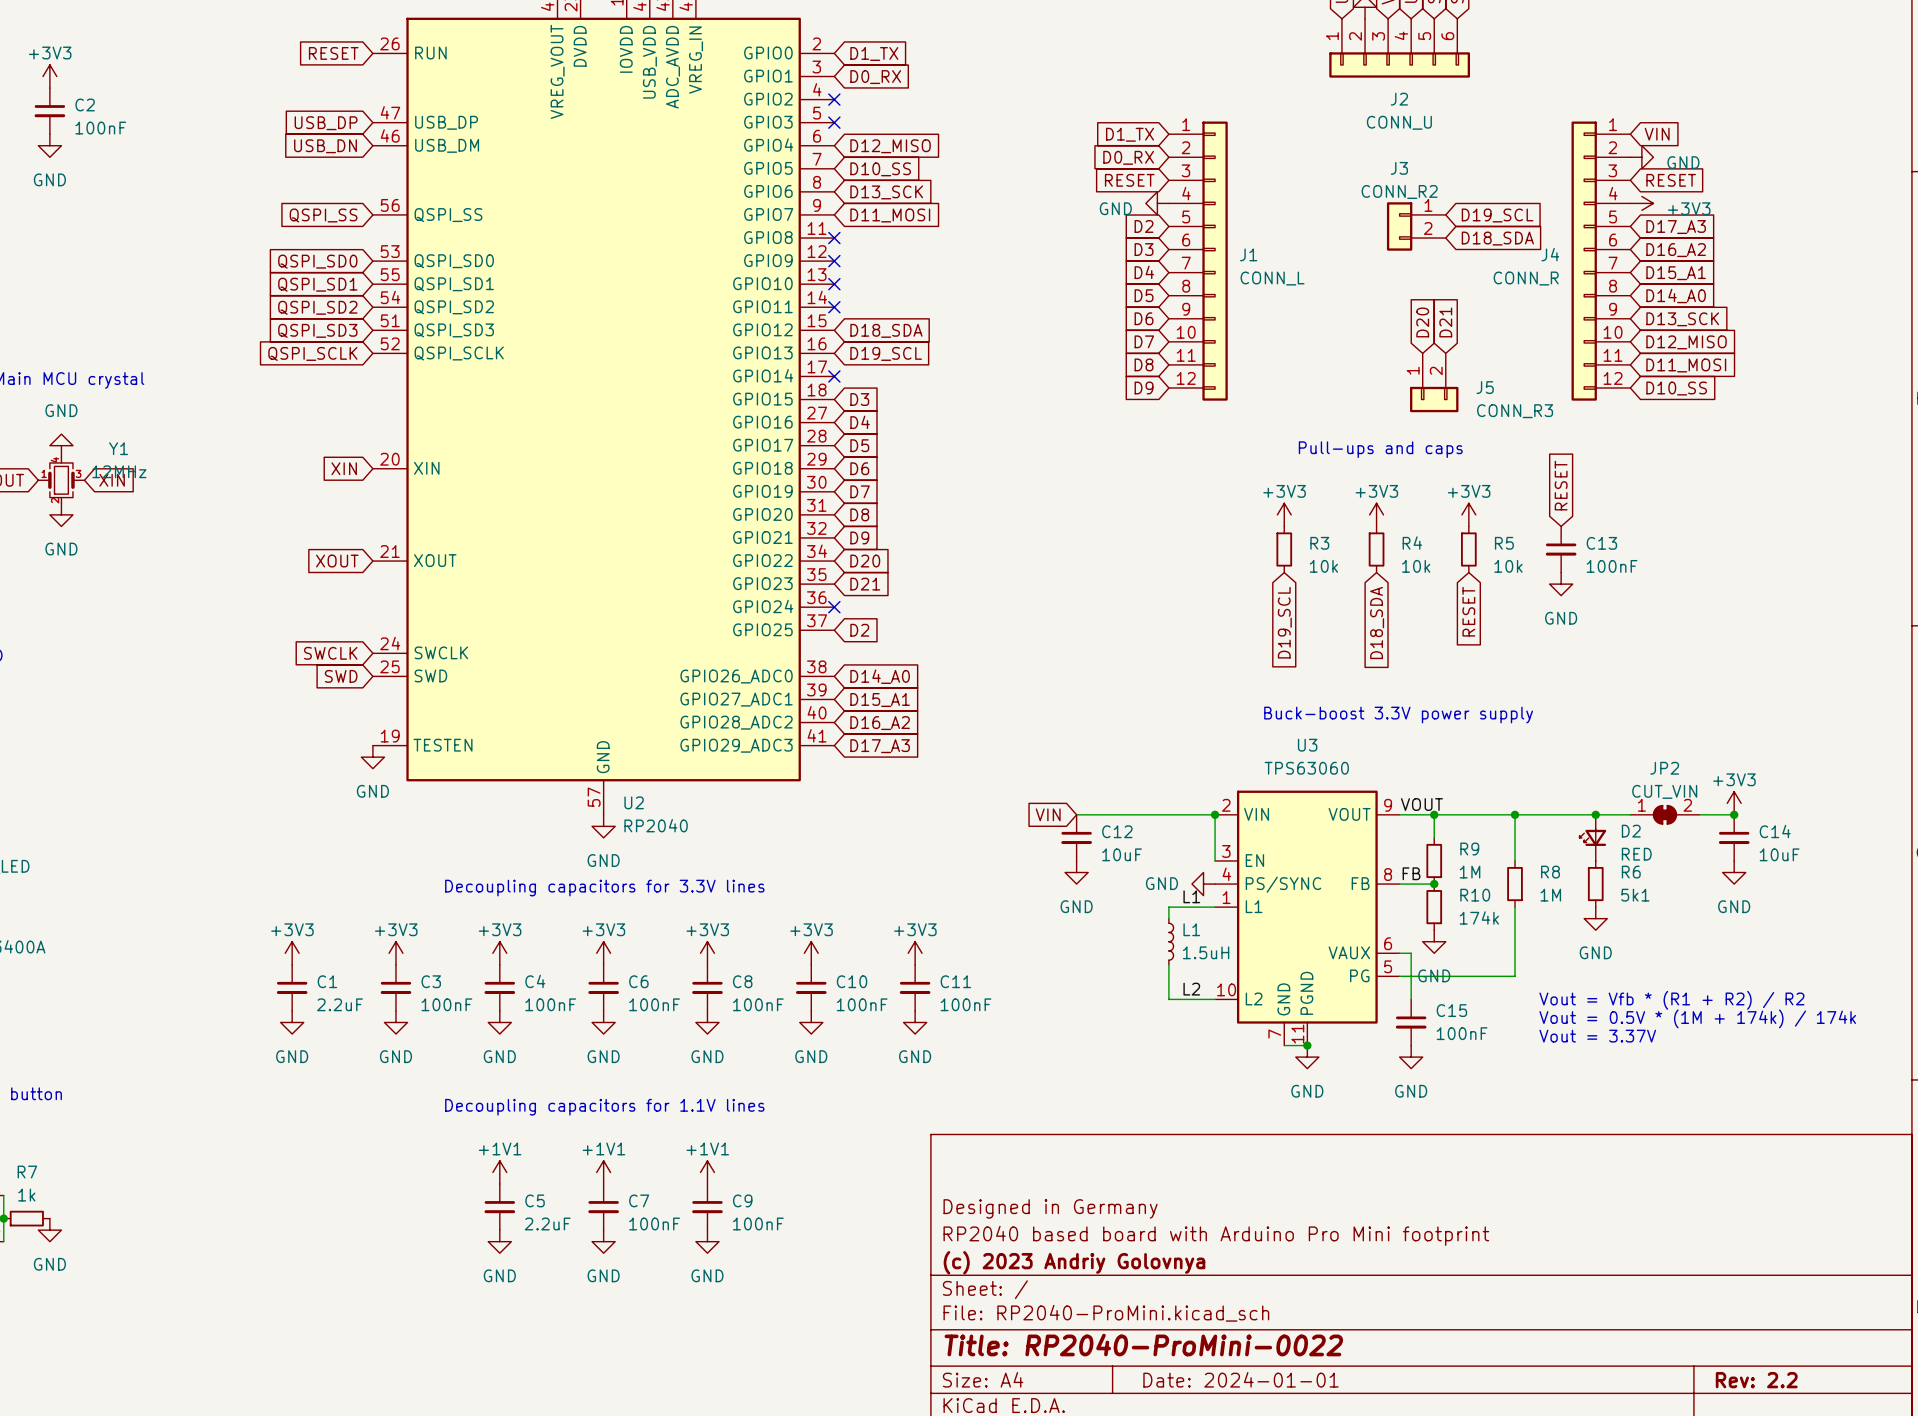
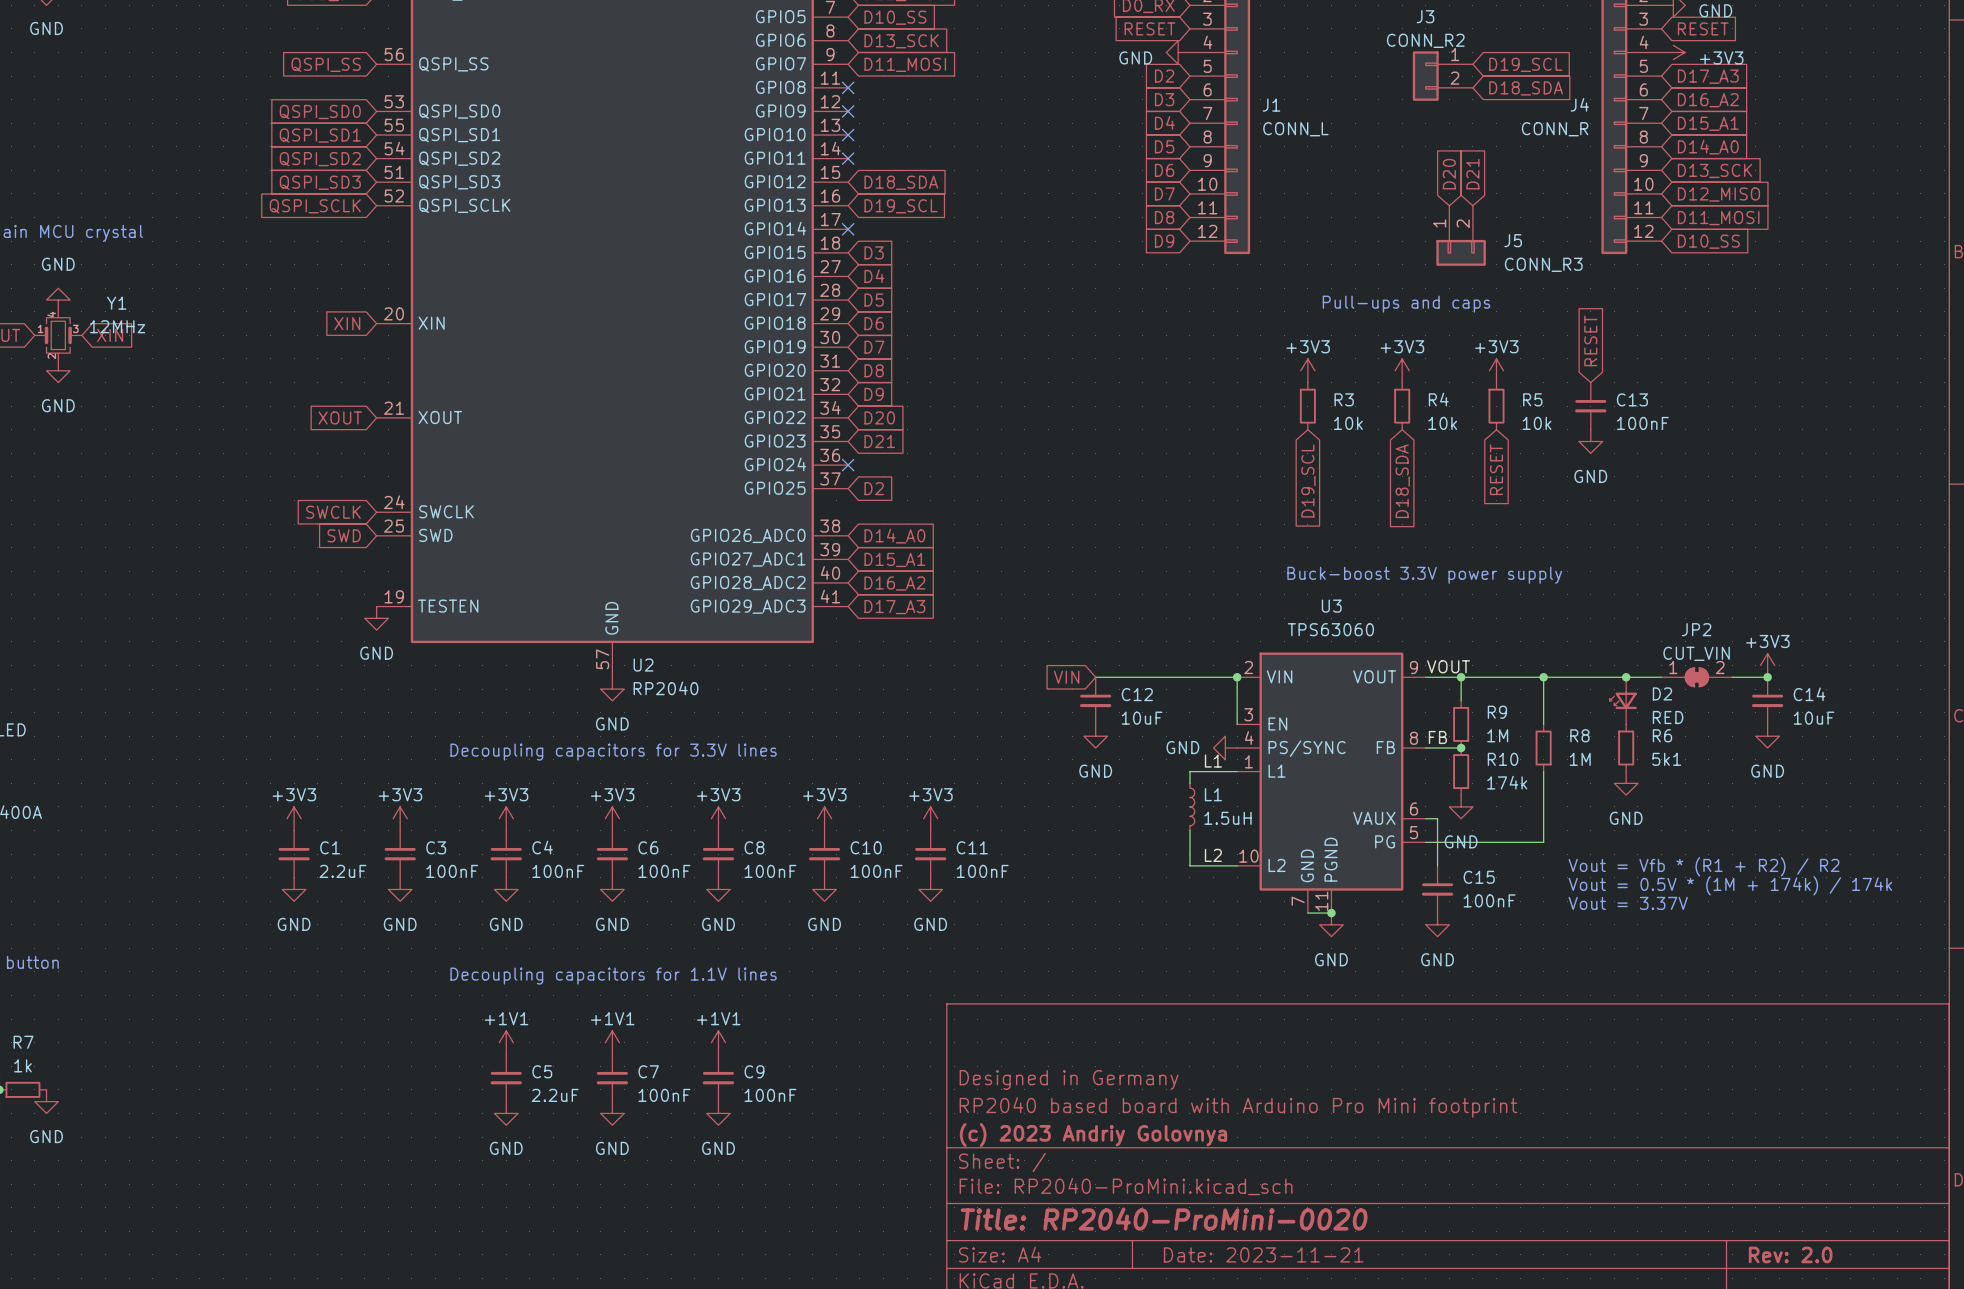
title block: Title: RP2040-ProMini-0022 (1143, 1345) -> Title: RP2040-ProMini-0020 (1164, 1219)
title block: Date: 2024-01-01 (1240, 1379) -> Date: 2023-11-21 (1263, 1254)
title block: Rev: 2.2 (1756, 1380) -> Rev: 2.0 (1790, 1254)

